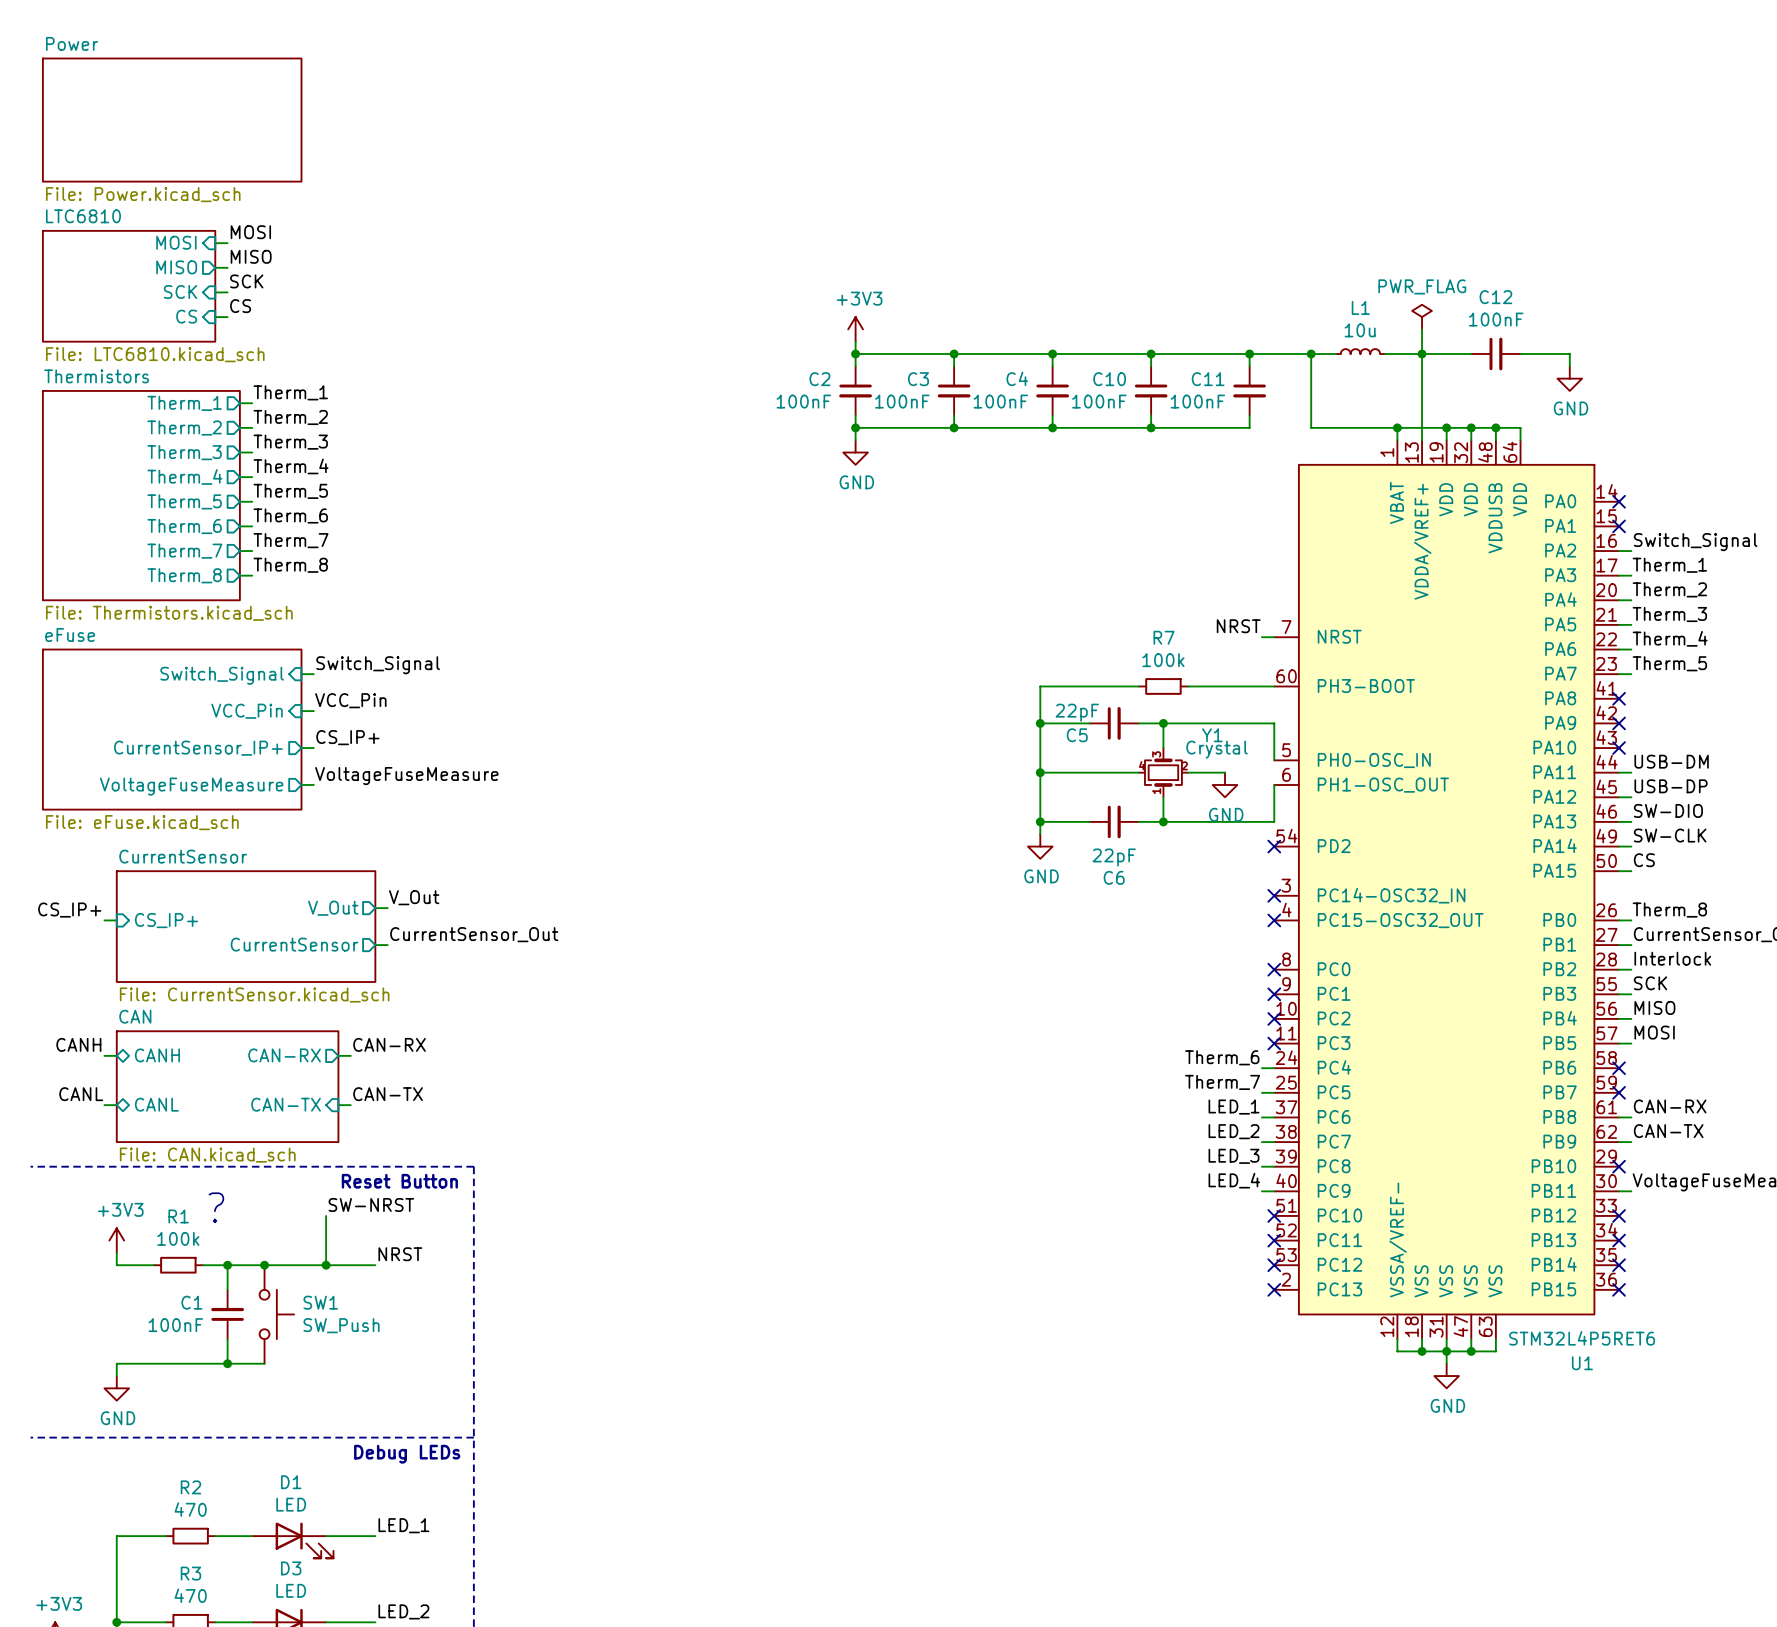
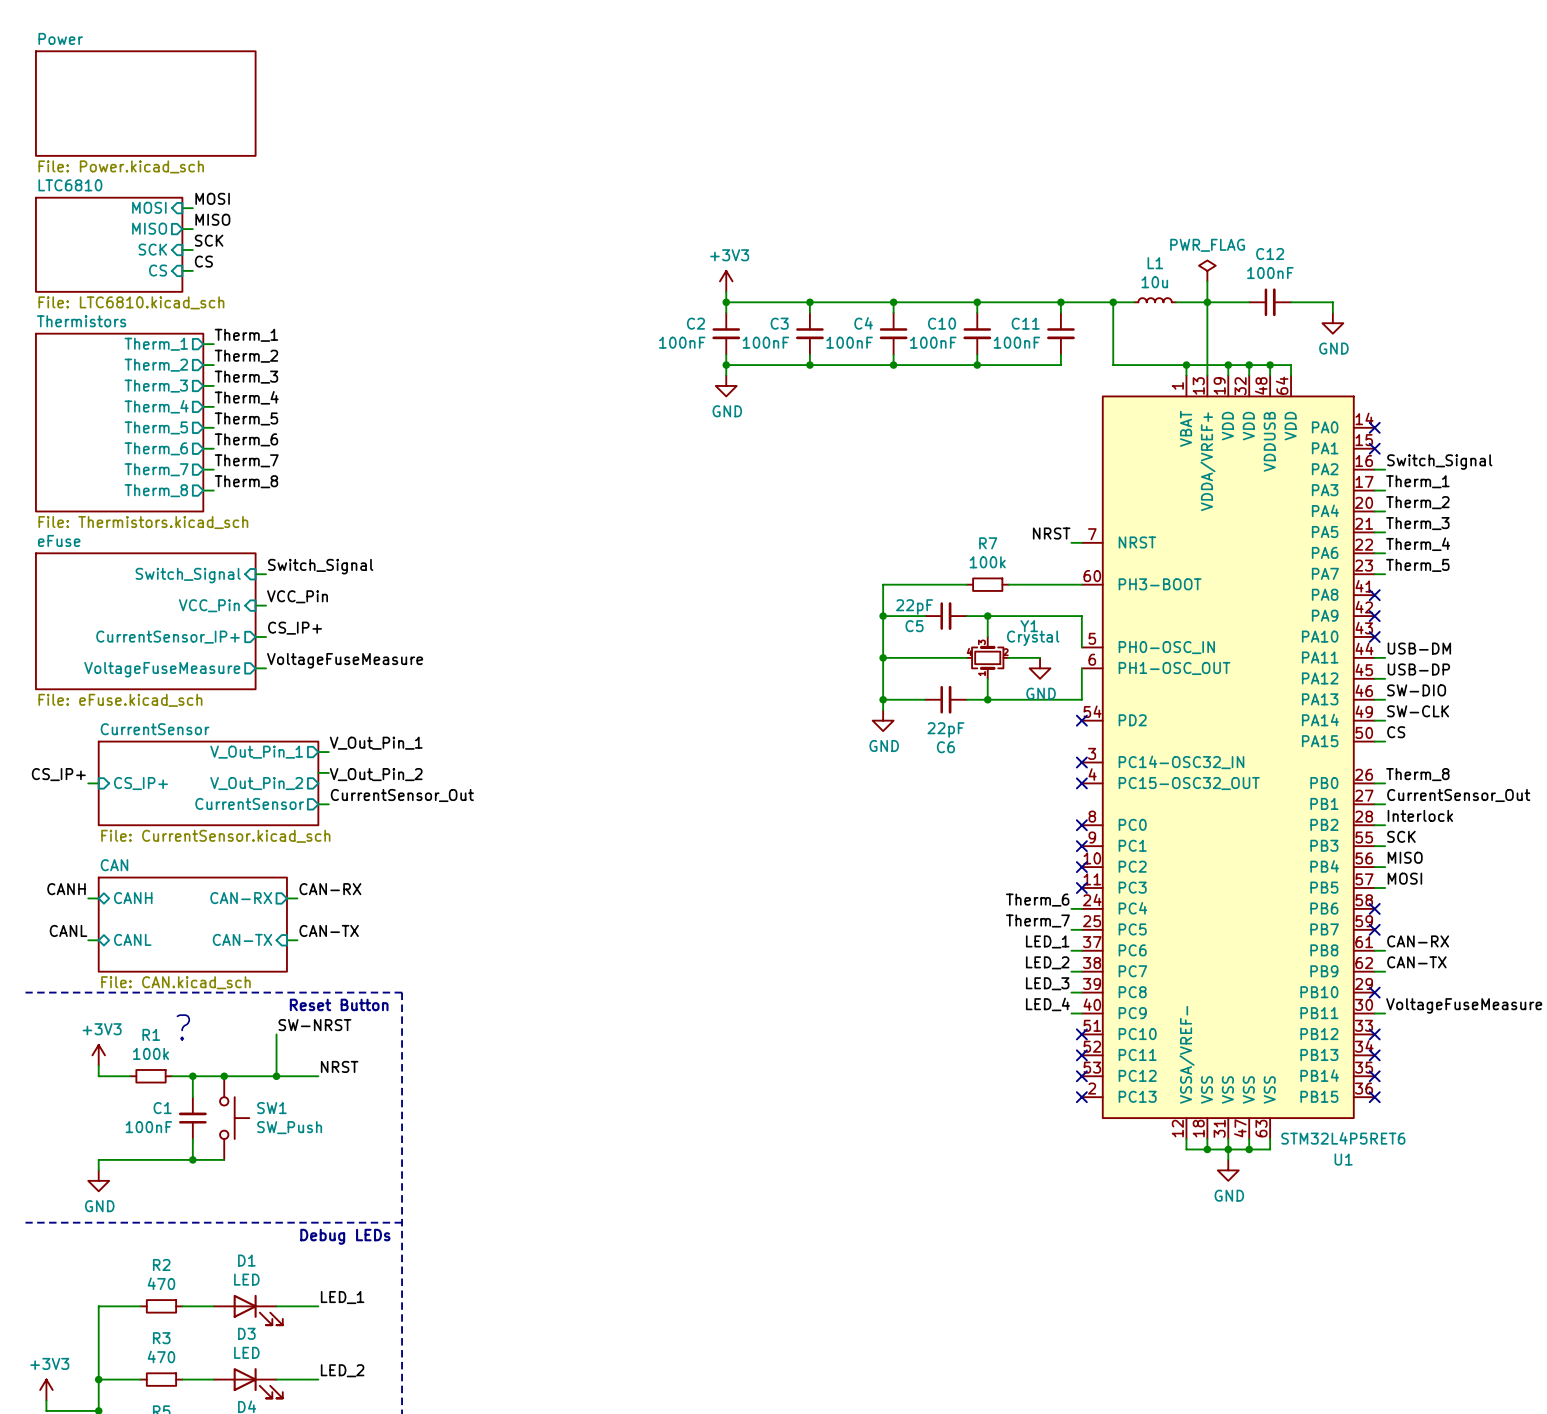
sheet CurrentSensor shape: [116, 871, 376, 983] -> [98, 741, 319, 826]
label: none -> V_Out_Pin_1 (376, 743)
sheet pin: none -> V_Out_Pin_1 (256, 752)
wire: none -> (318, 752) (328, 752)
label: V_Out (414, 897) -> none
sheet pin: V_Out (333, 908) -> none
label: none -> V_Out_Pin_2 (376, 774)
sheet pin: none -> V_Out_Pin_2 (256, 783)

